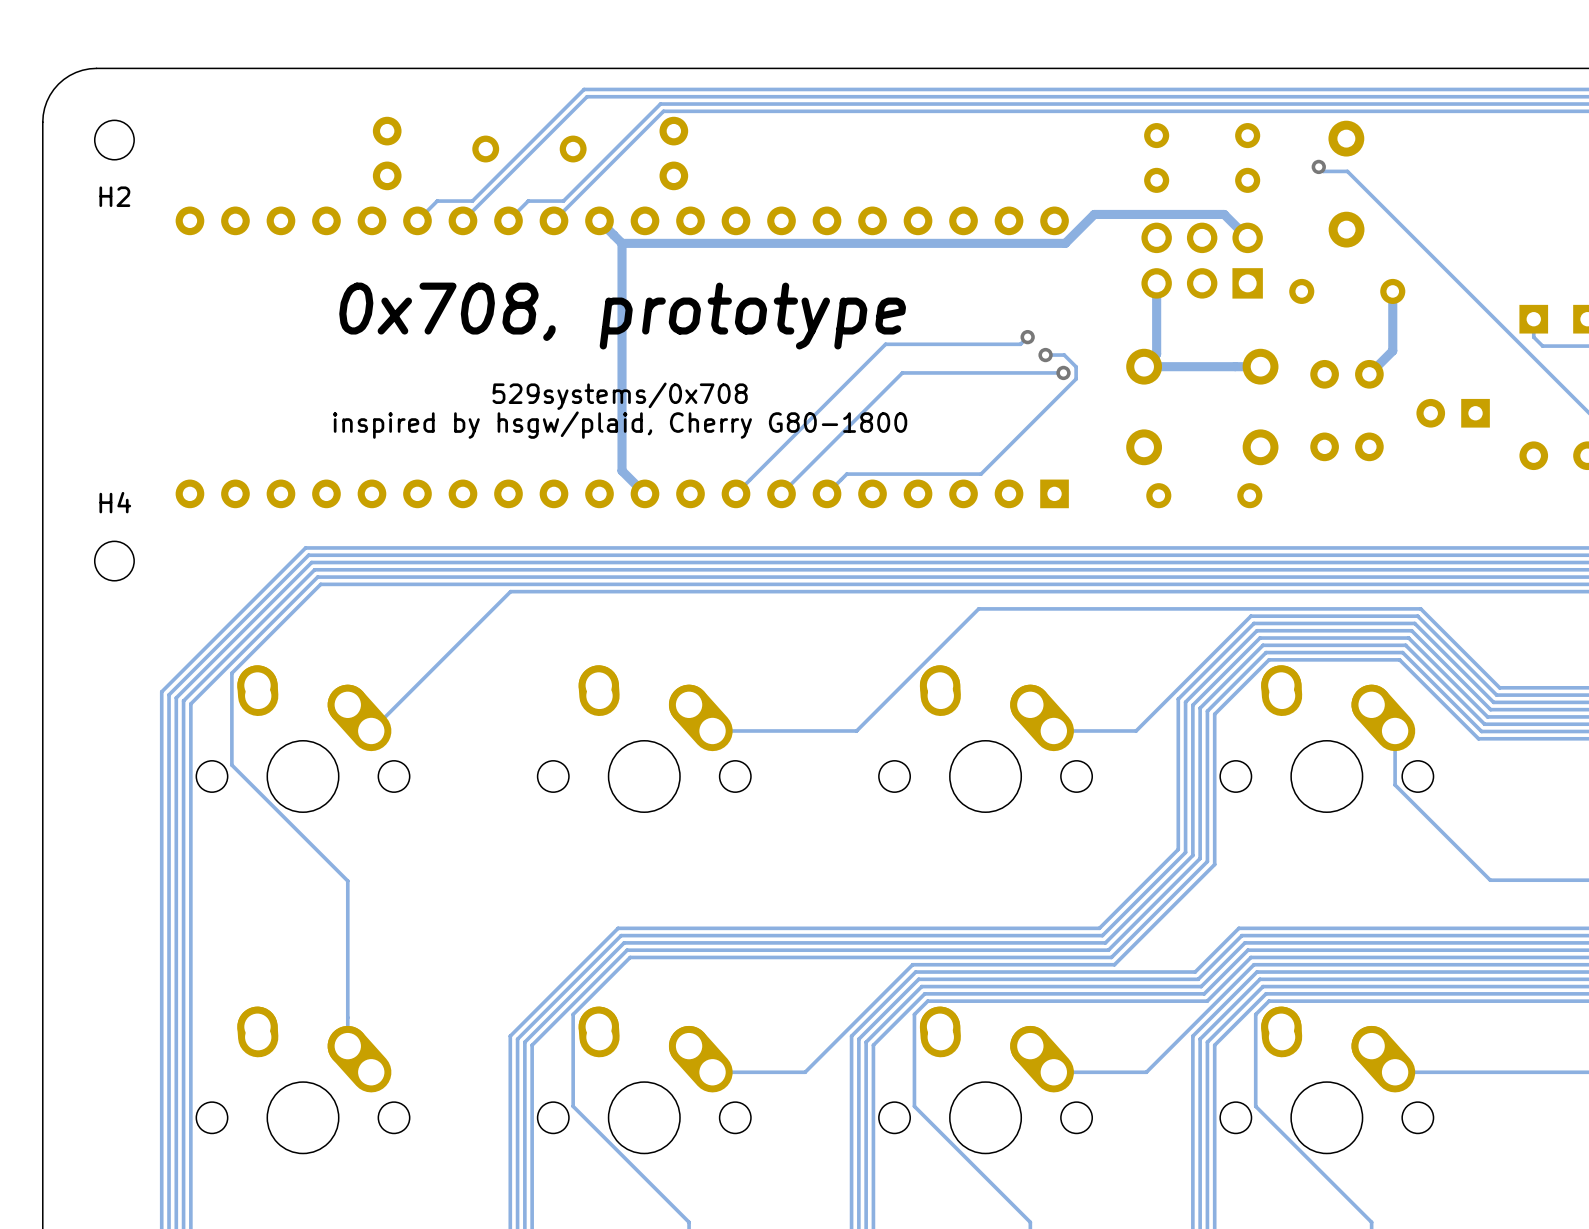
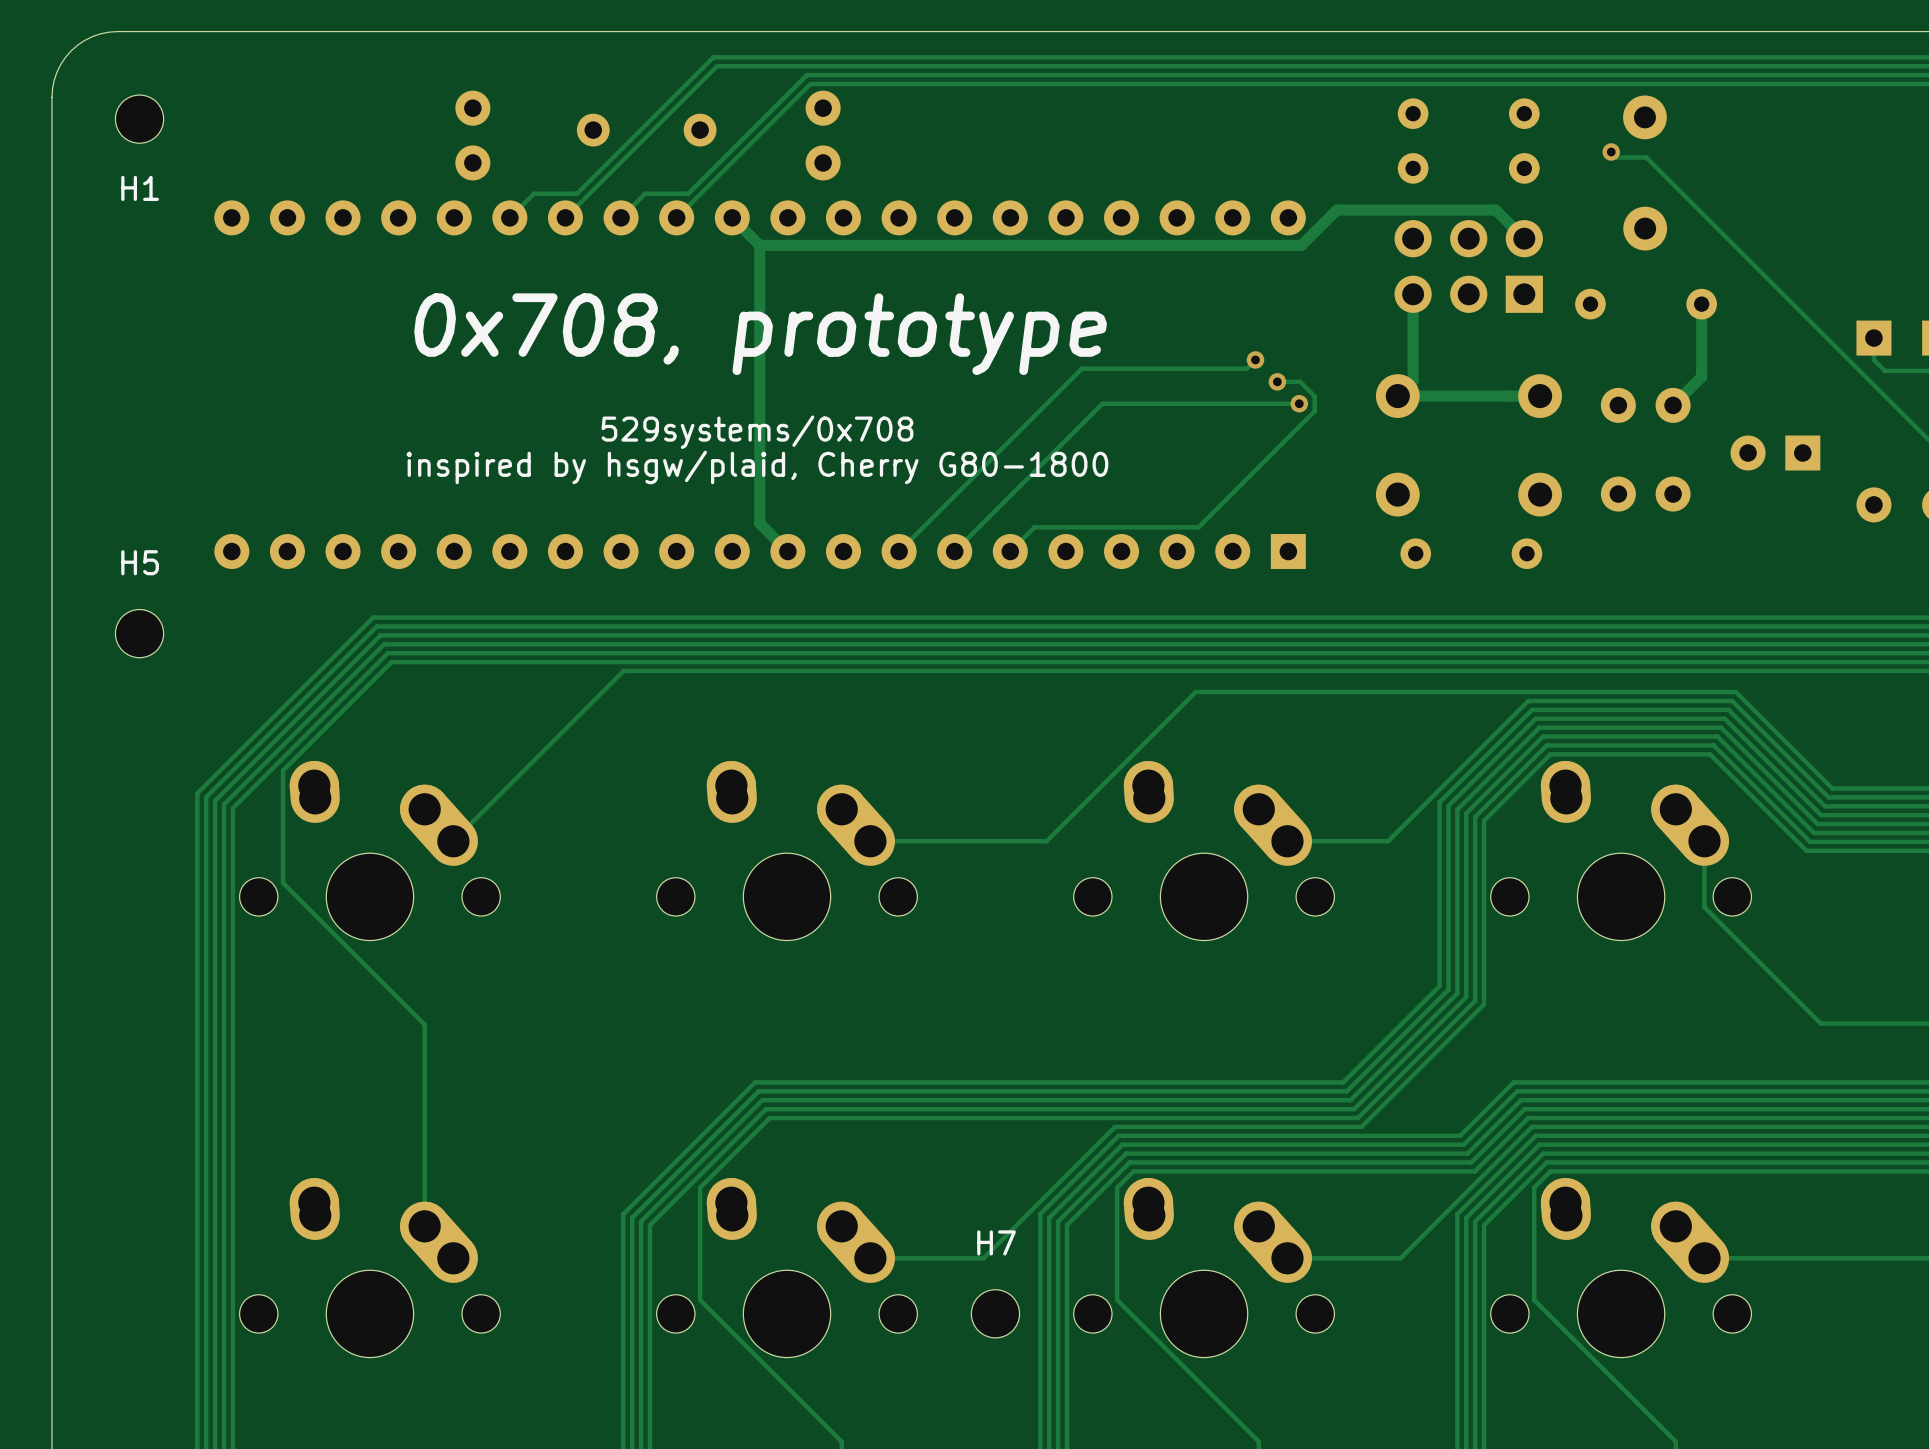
H2 name: H2 (114, 196) -> H1 (140, 188)
H4 name: H4 (115, 502) -> H5 (140, 562)
H7: none -> (995, 1313)

